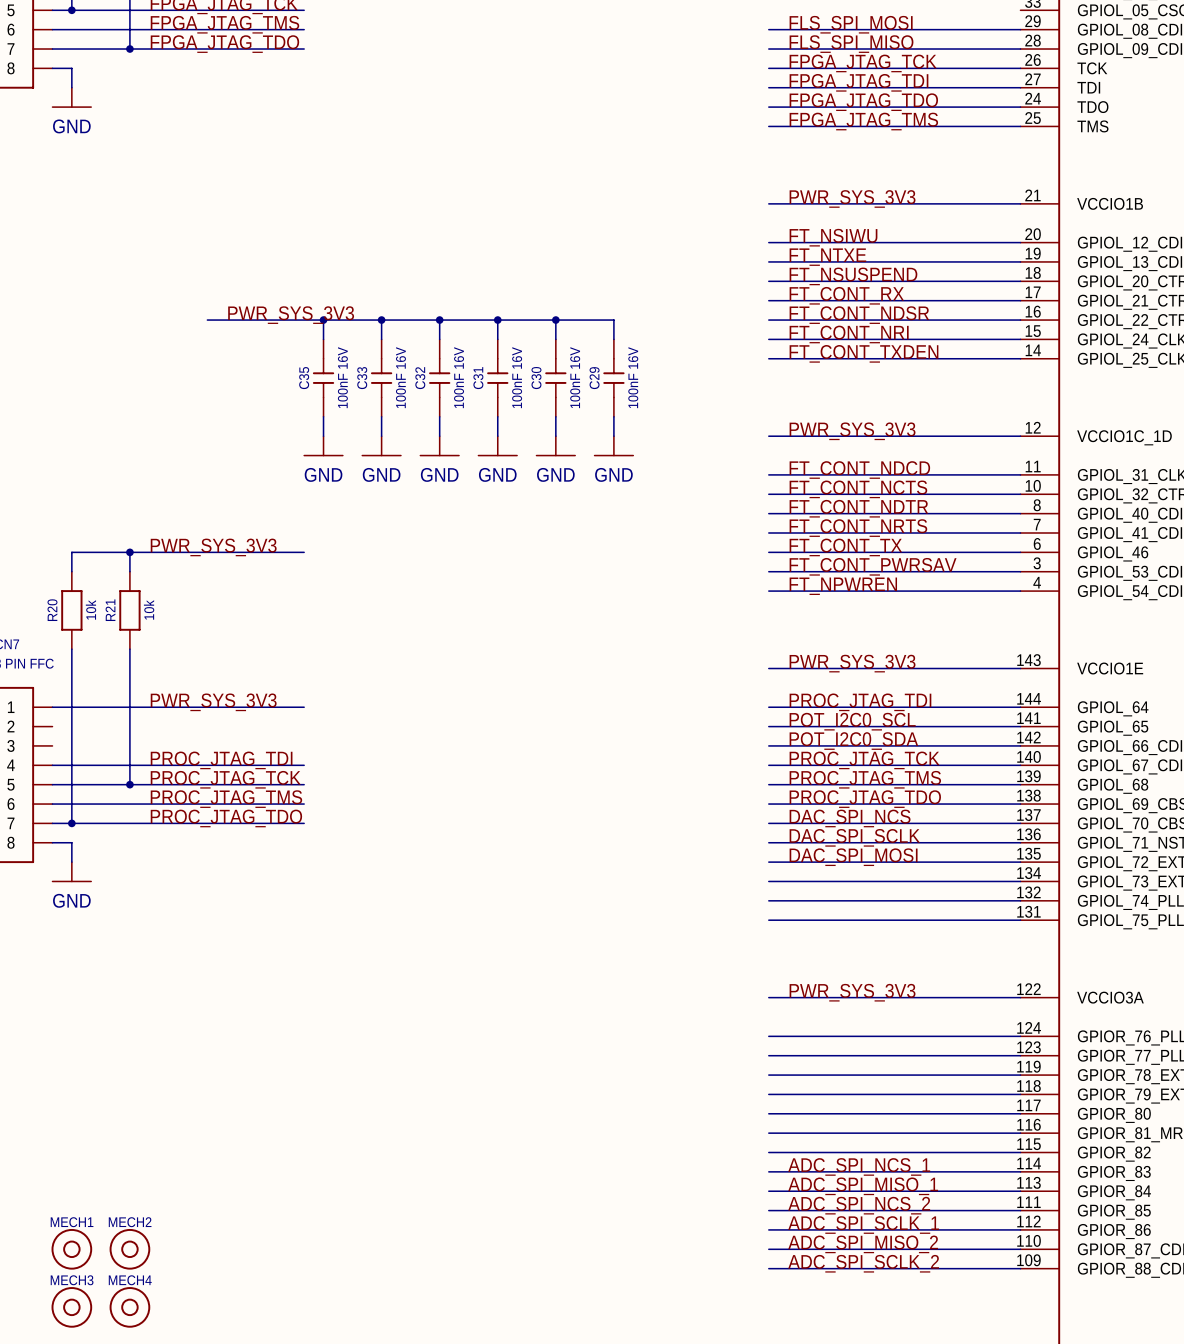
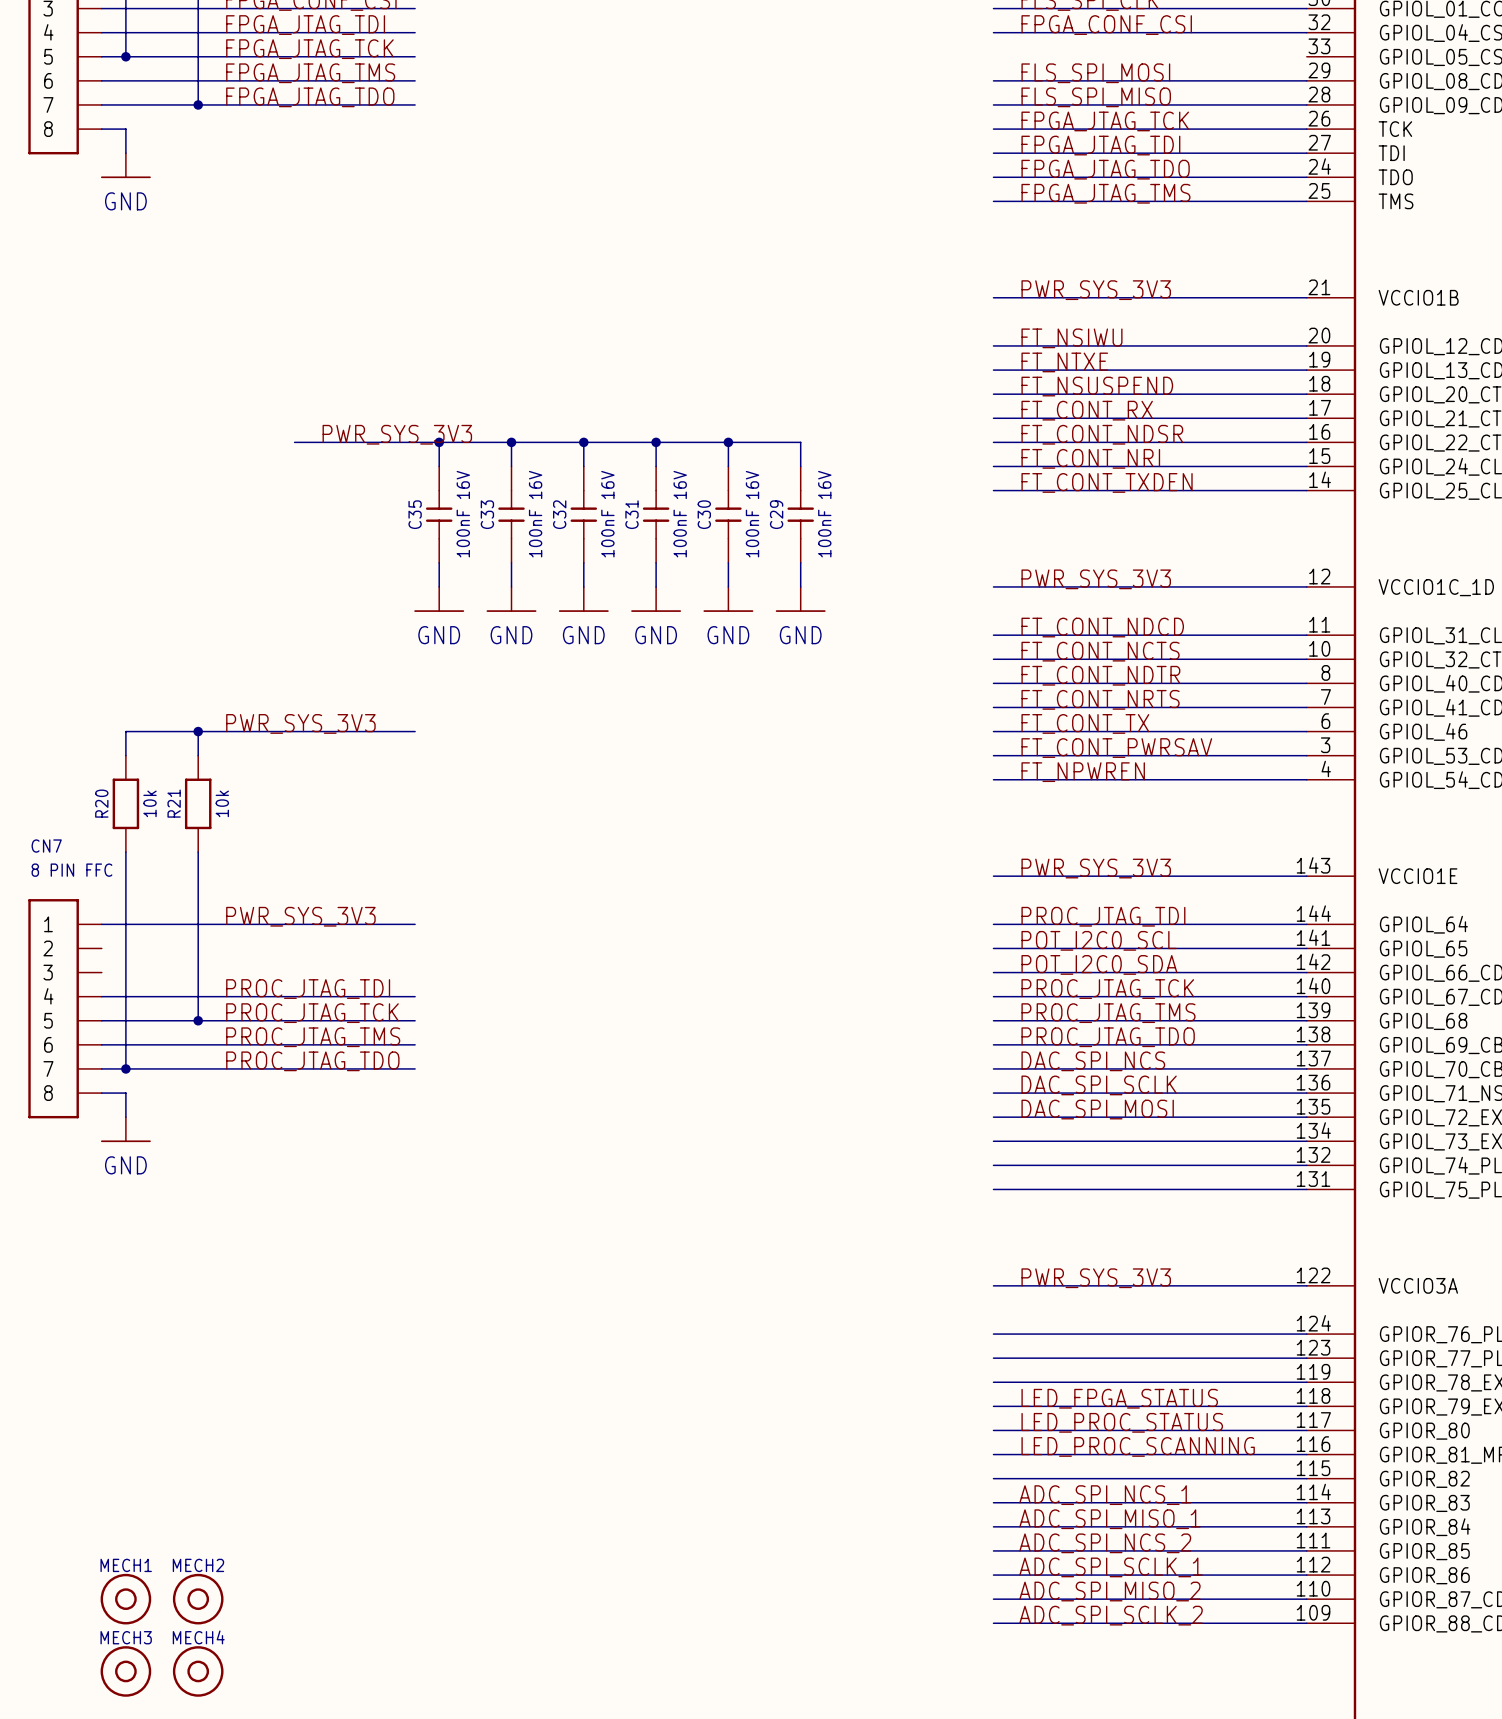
label: none -> LED_FPGA_STATUS (1119, 1398)
label: none -> LED_PROC_STATUS (1122, 1422)
label: none -> LED_PROC_SCANNING (1138, 1446)

